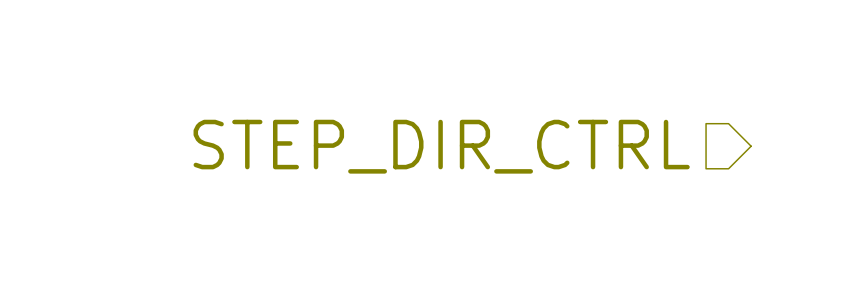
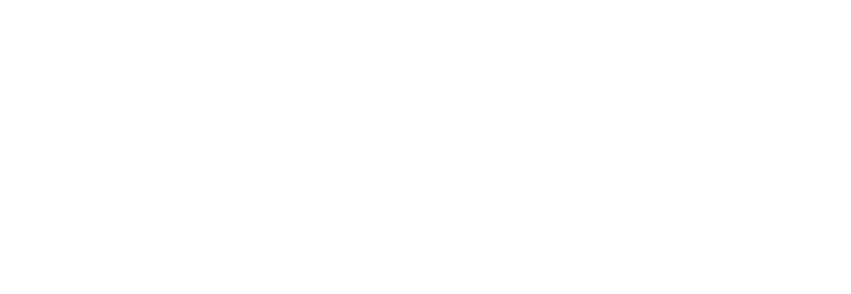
hierarchical label: STEP_DIR_CTRL (441, 146) -> none

